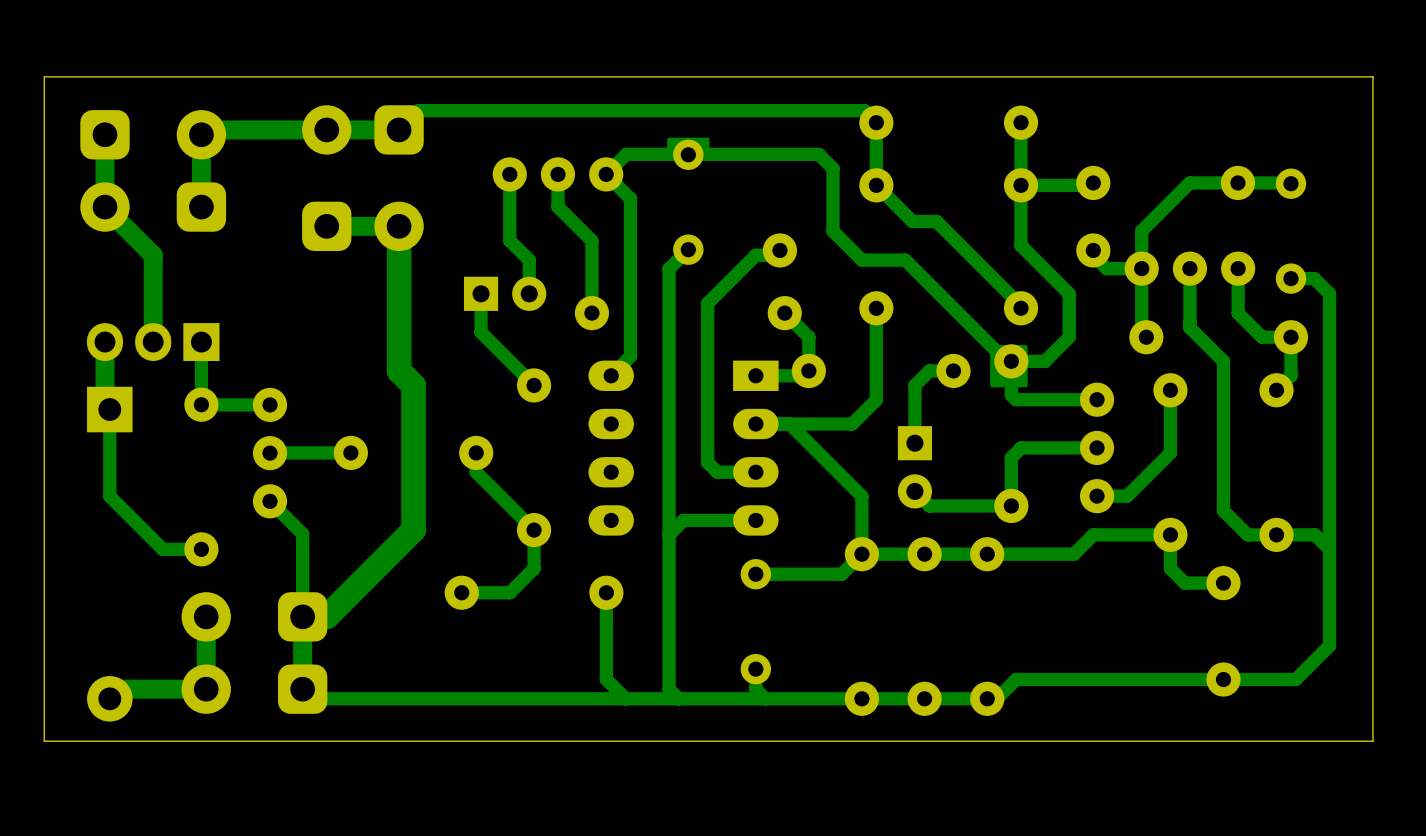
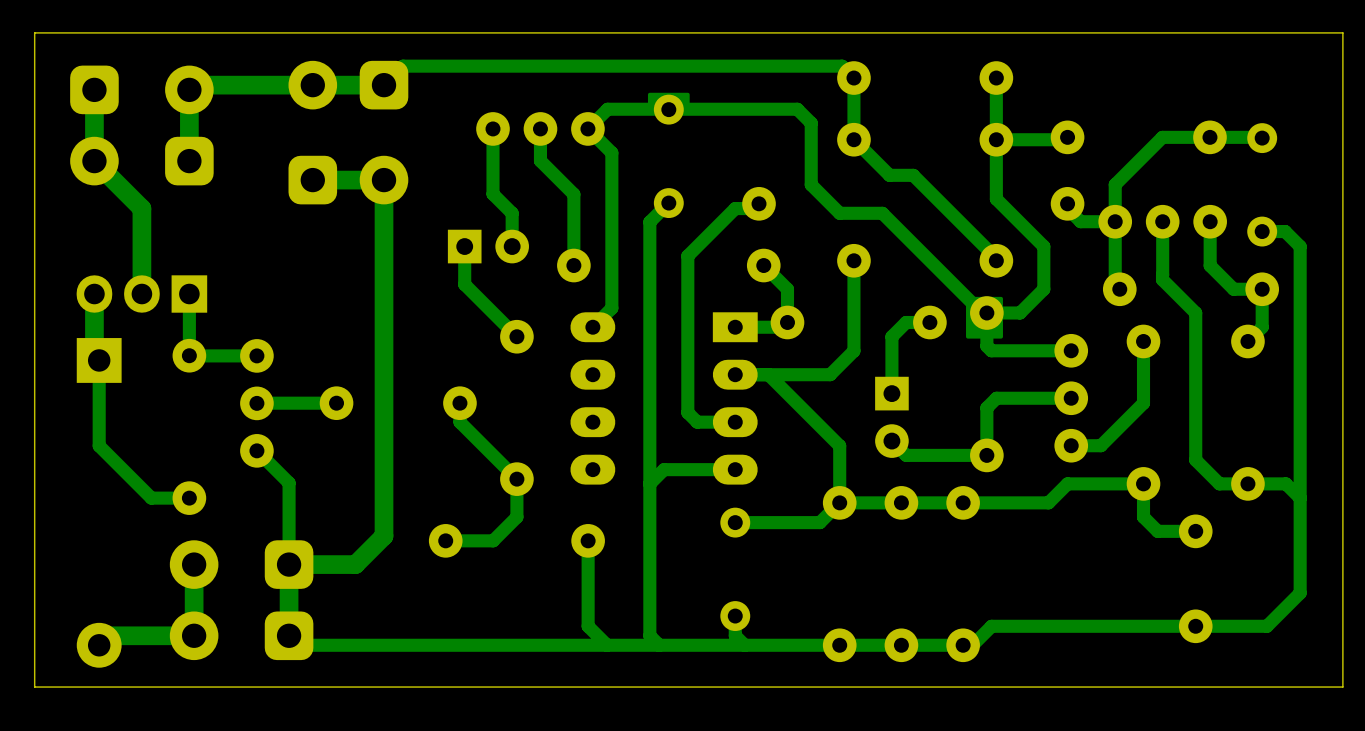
track width: thick (399, 226) (399, 370) -> thin (384, 180) (384, 322)
track: (399, 370) (413, 385) (413, 530) (326, 616) -> (384, 322) (384, 536) (355, 564) (312, 564)

